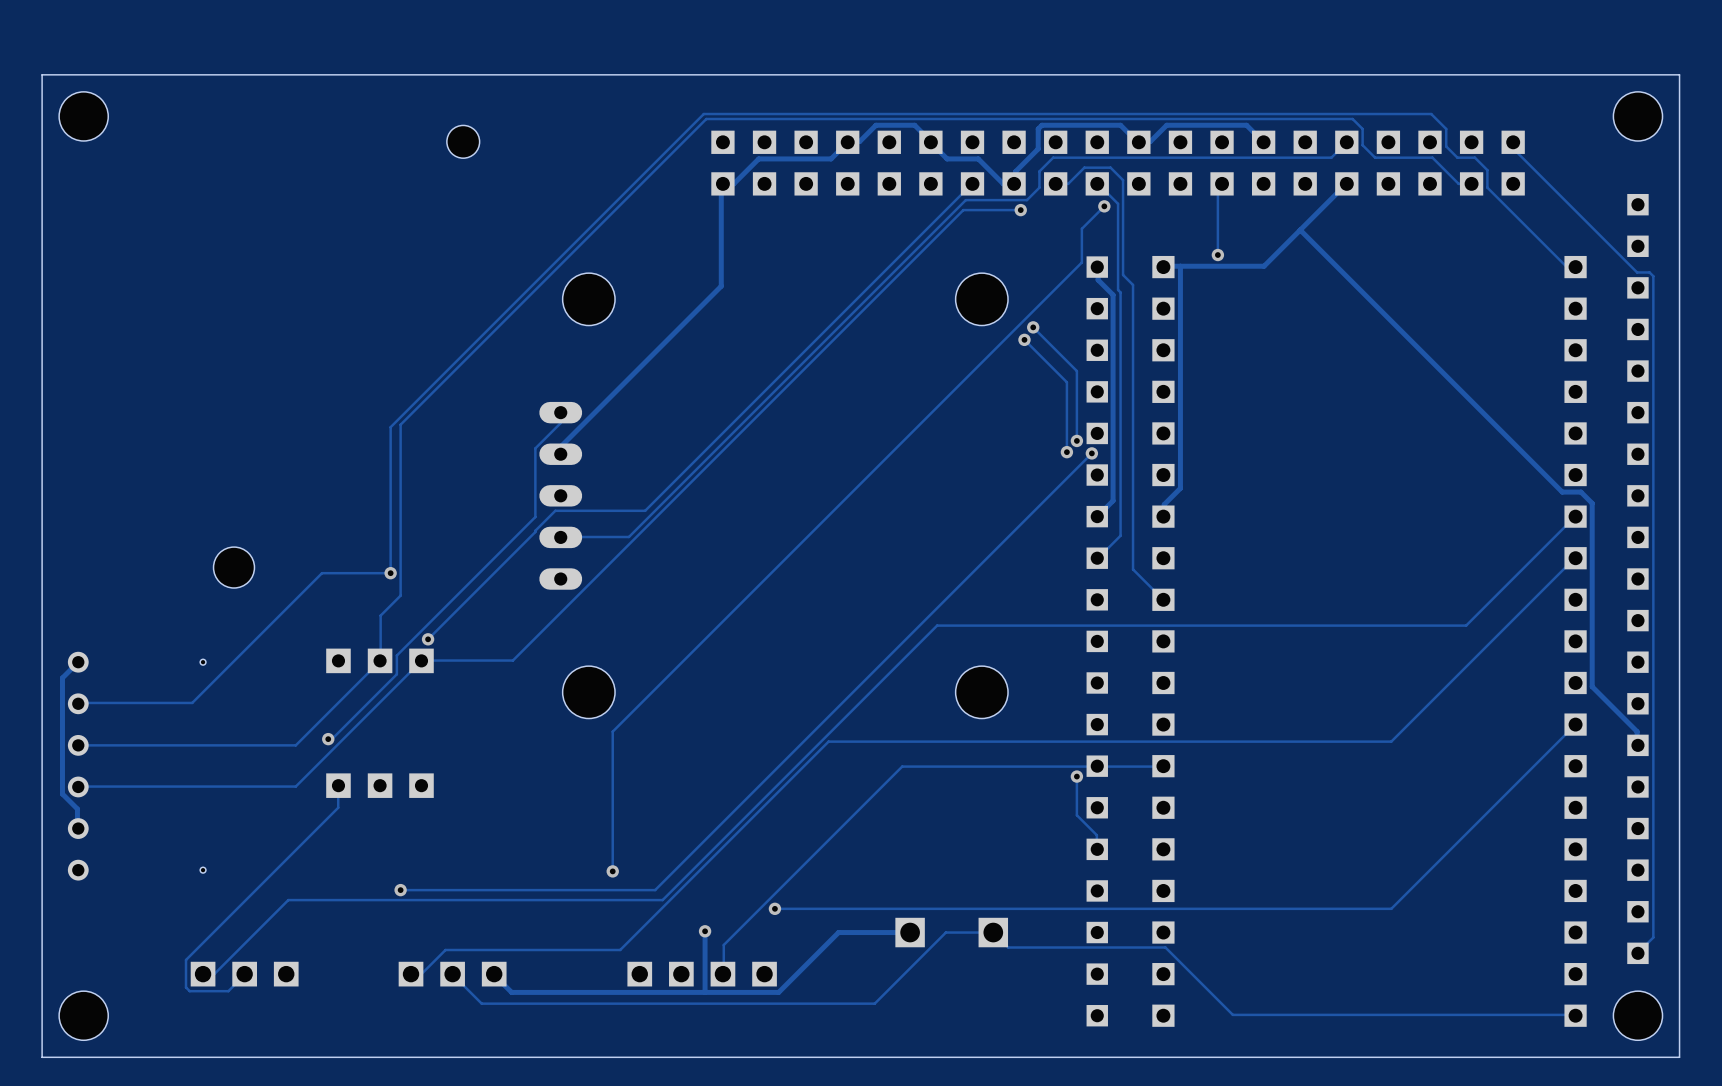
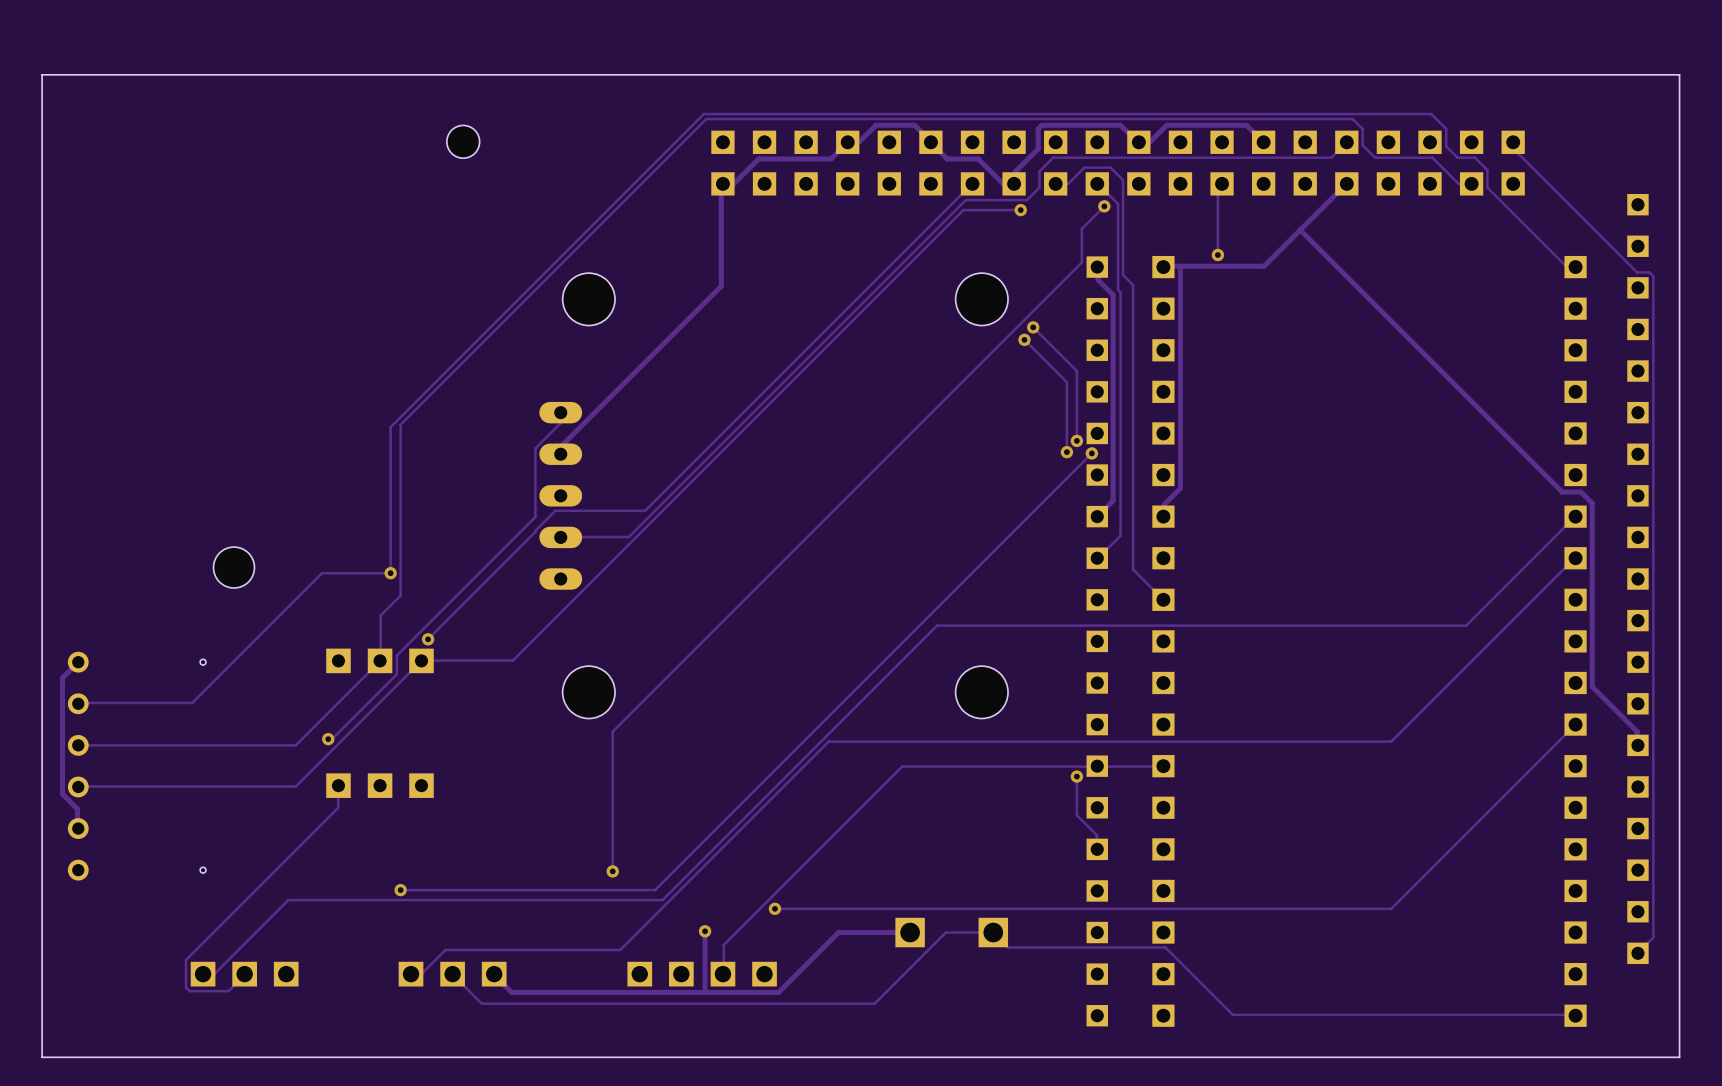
hole: (83, 116) -> none
hole: (1637, 116) -> none
hole: (83, 1015) -> none
hole: (1637, 1015) -> none

